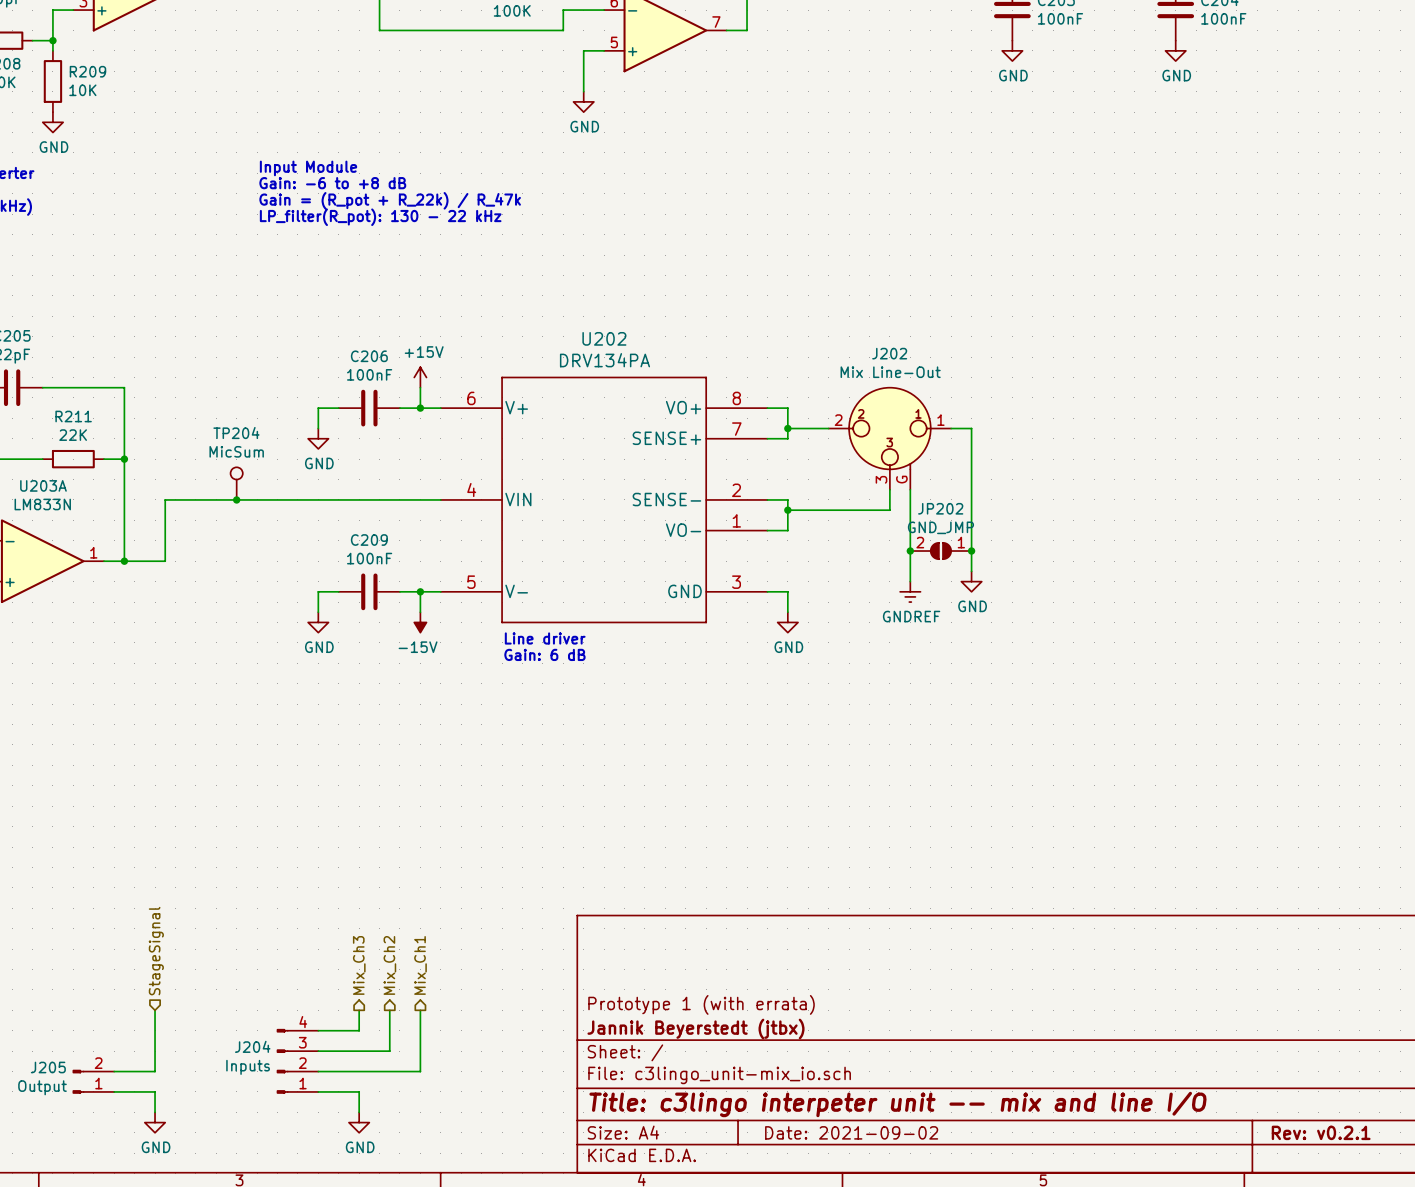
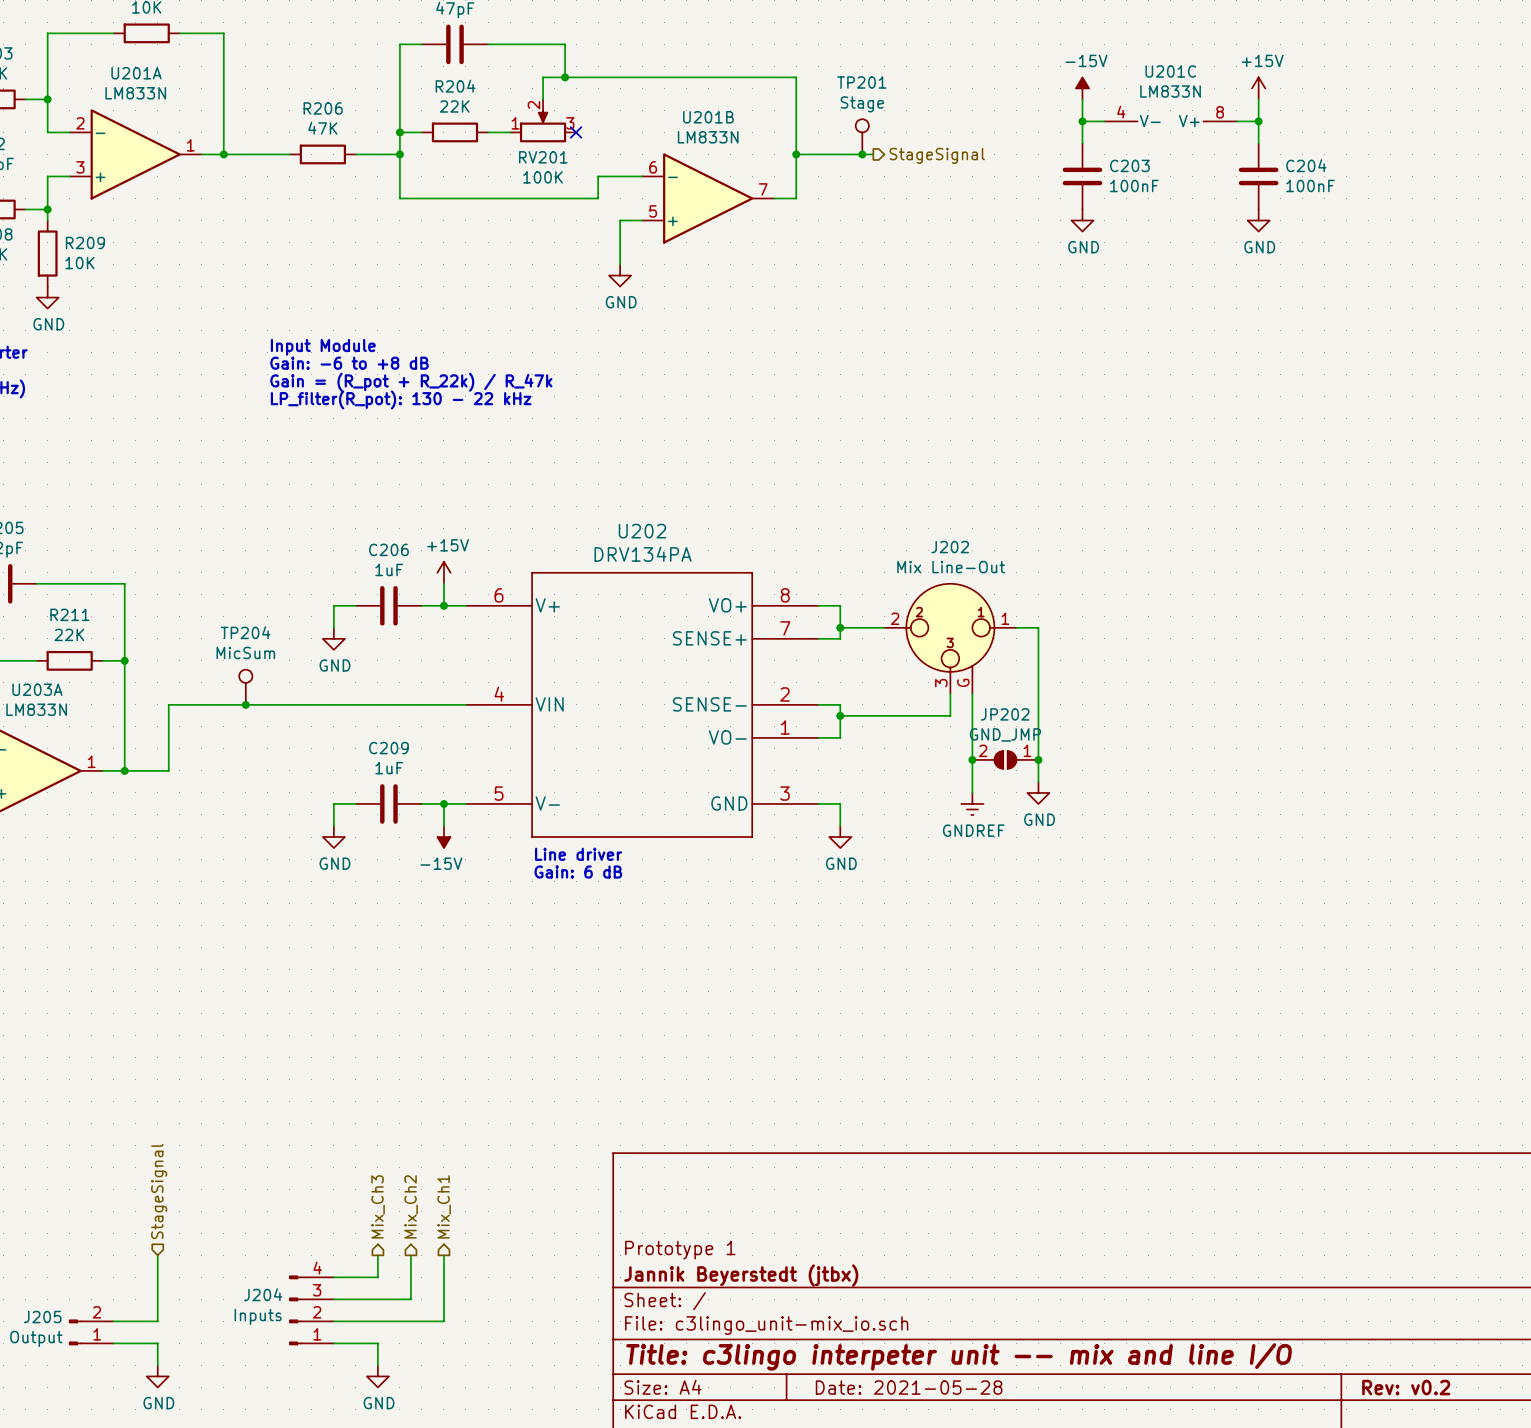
C206 value: 100nF (369, 374) -> 1uF (389, 569)
C209 value: 100nF (369, 558) -> 1uF (389, 768)
title block: Prototype 1 (with errata) (701, 1004) -> Prototype 1 (680, 1250)
title block: Date: 2021-09-02 (851, 1132) -> Date: 2021-05-28 (909, 1387)
title block: Rev: v0.2.1 (1321, 1132) -> Rev: v0.2 (1406, 1387)

